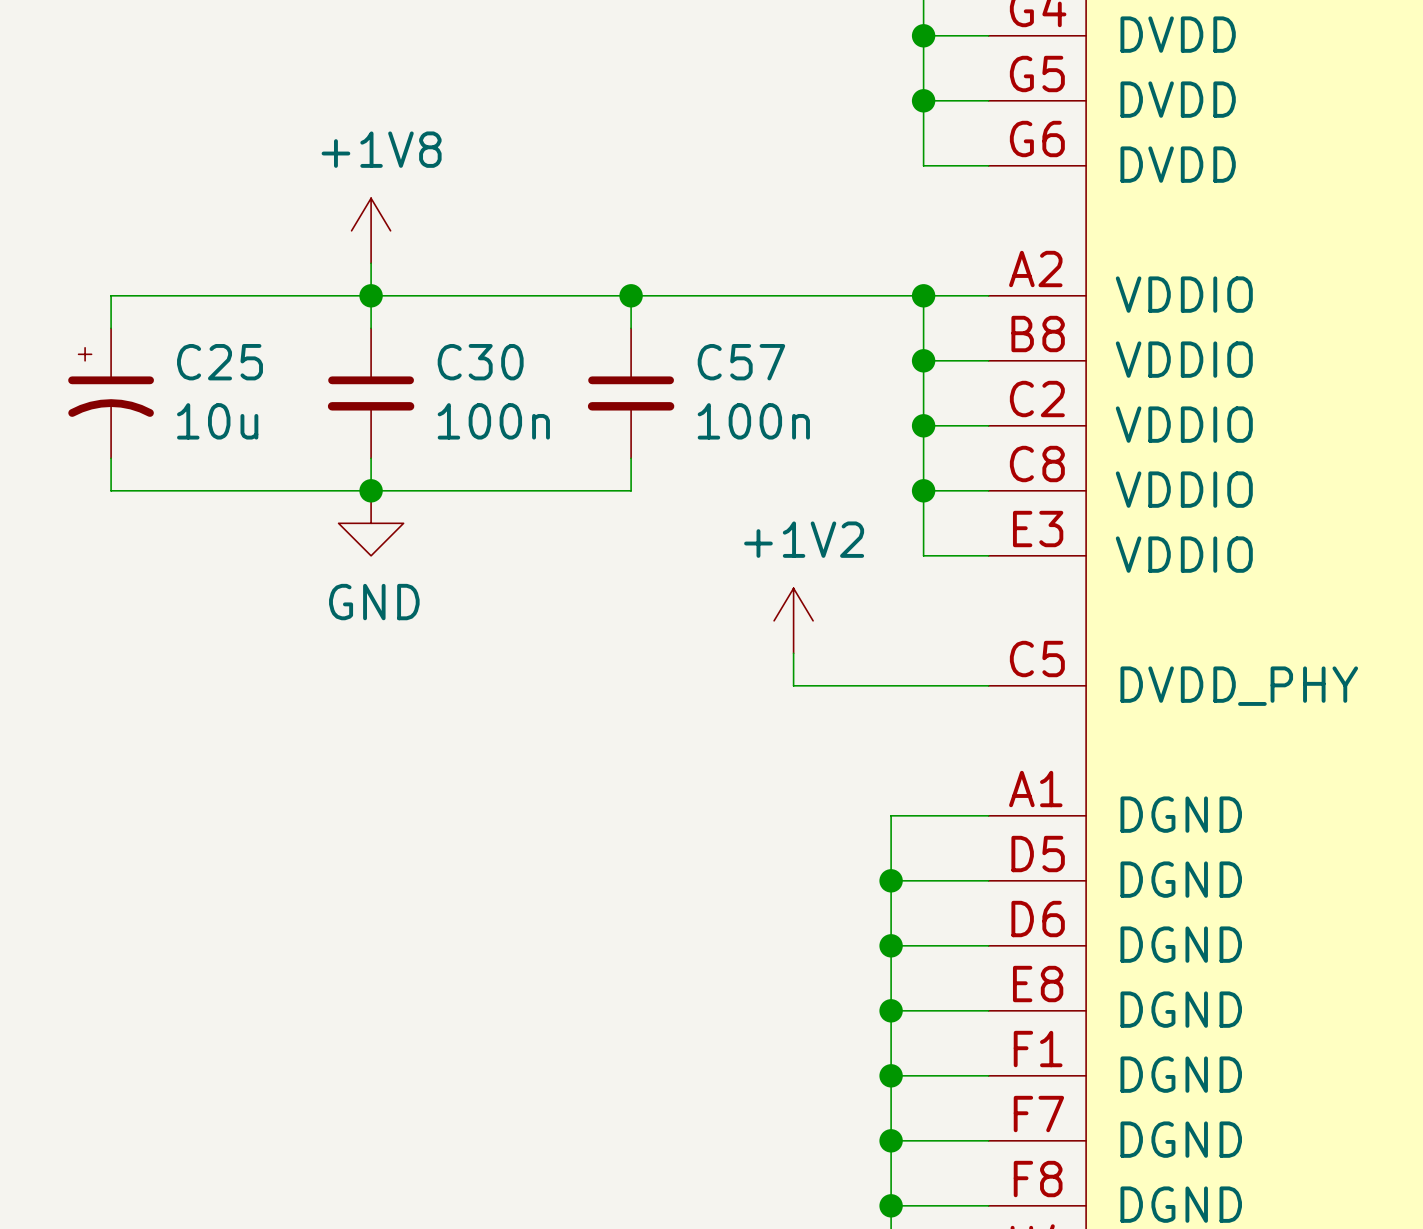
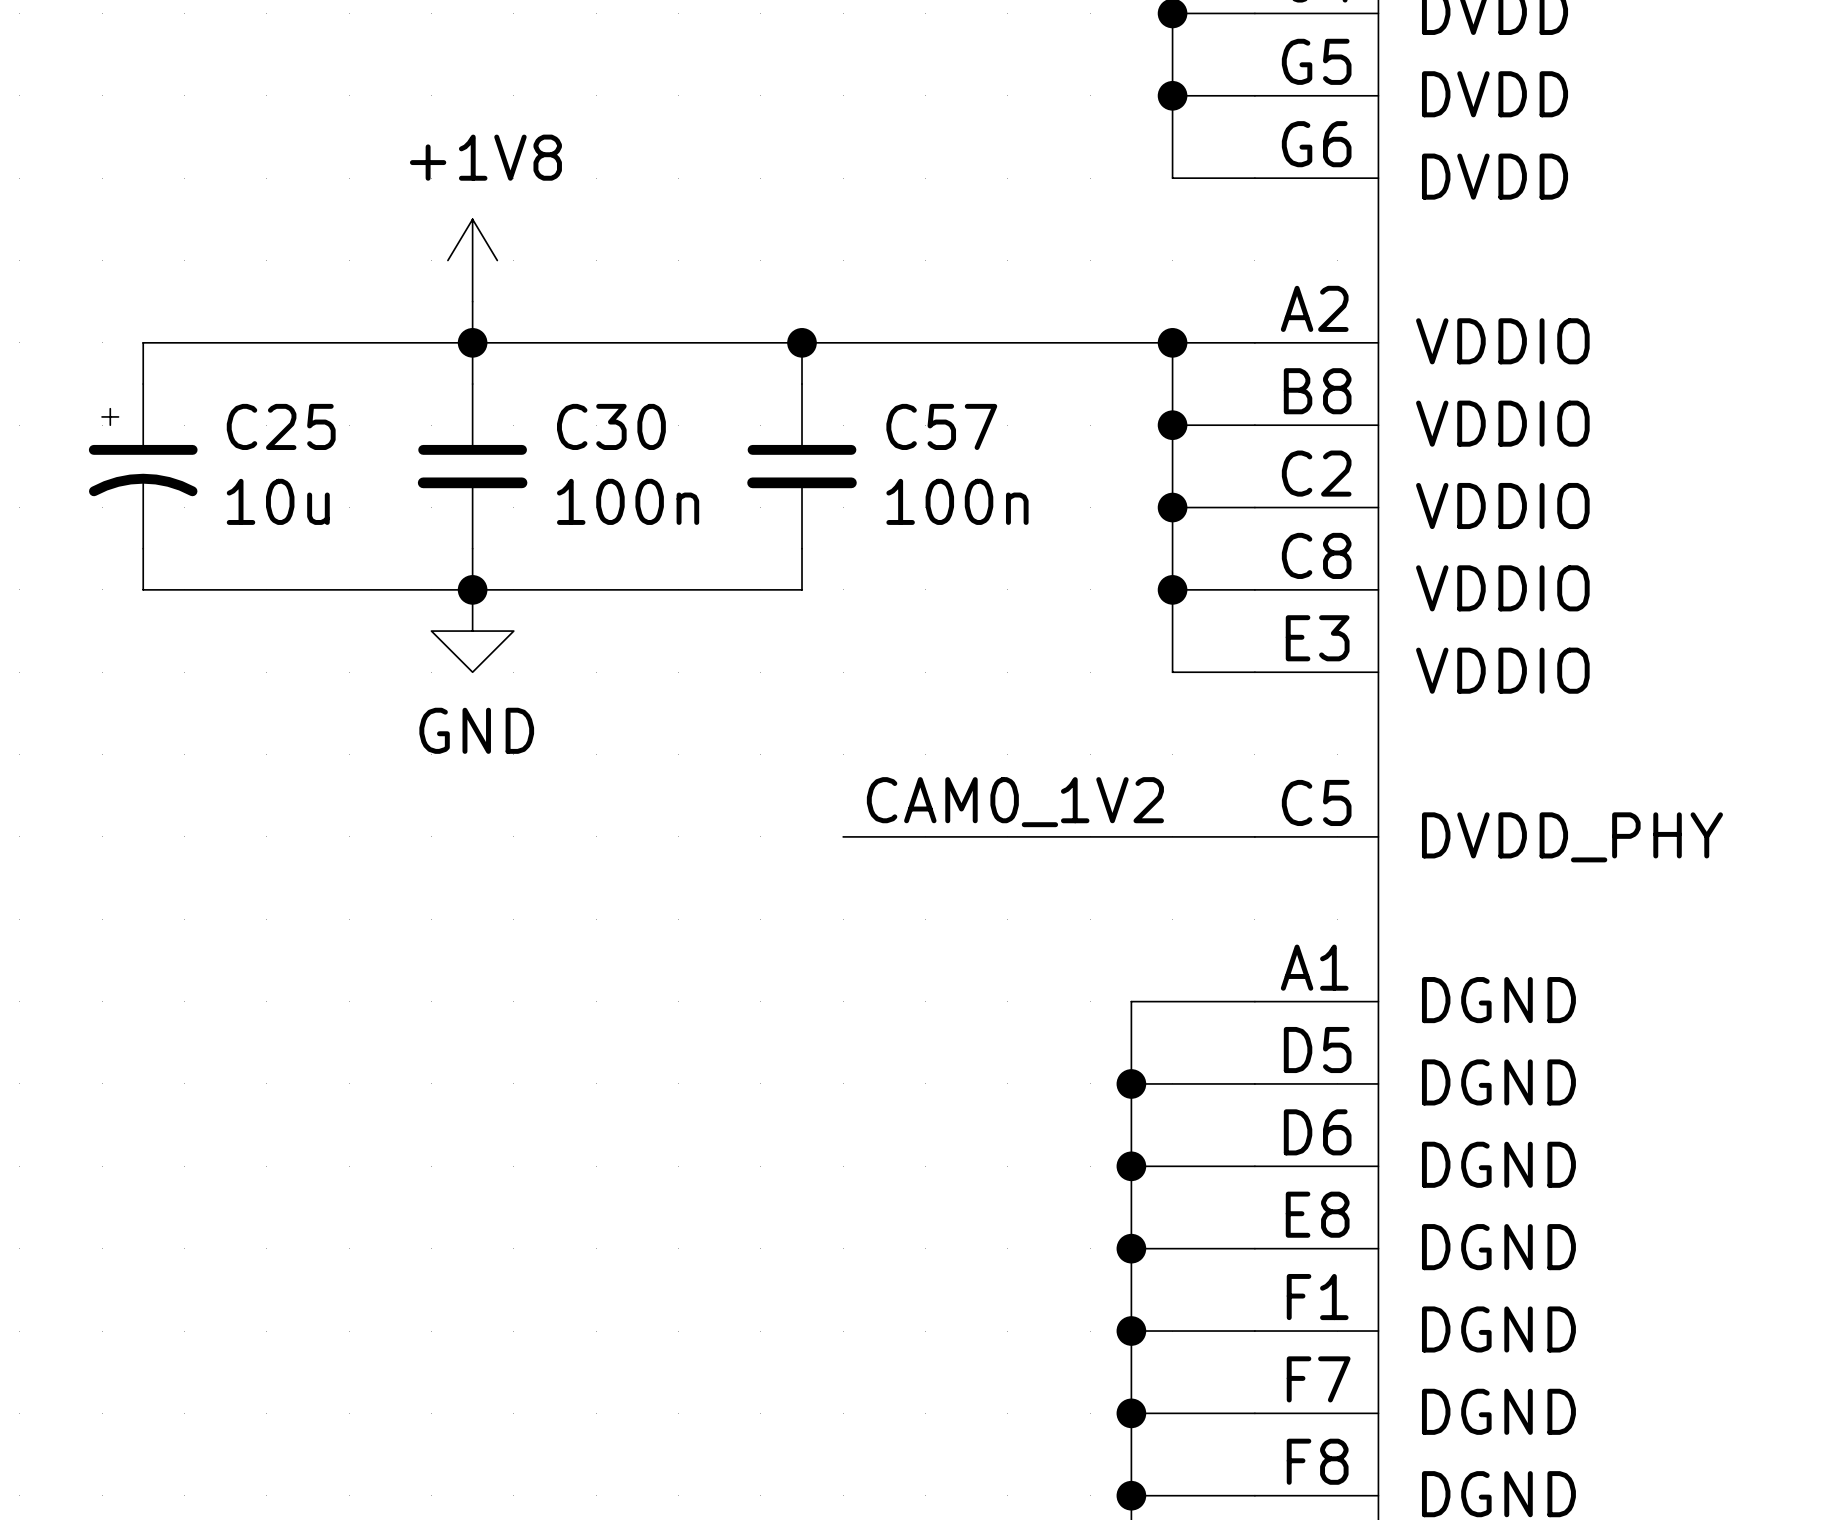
power symbol: +1V2 (793, 620) -> none
wire: (793, 653) (793, 685) -> (843, 836) (1007, 836)
label: none -> CAM0_1V2 (1015, 802)

